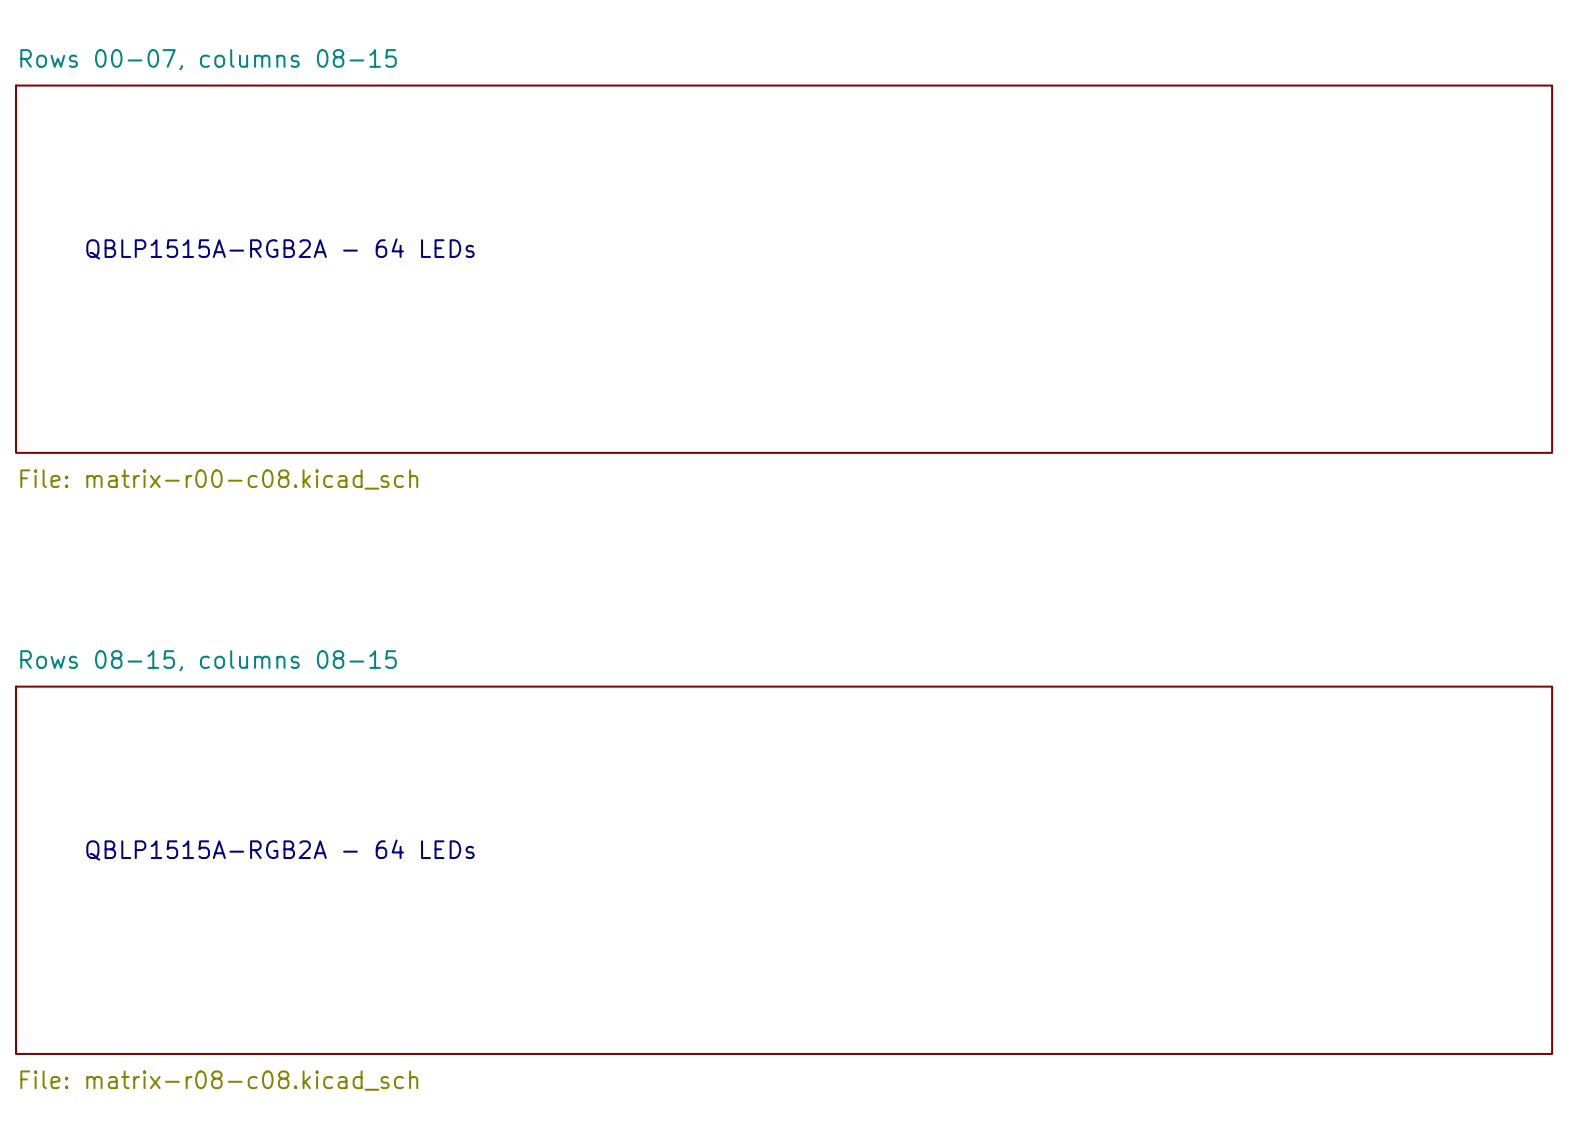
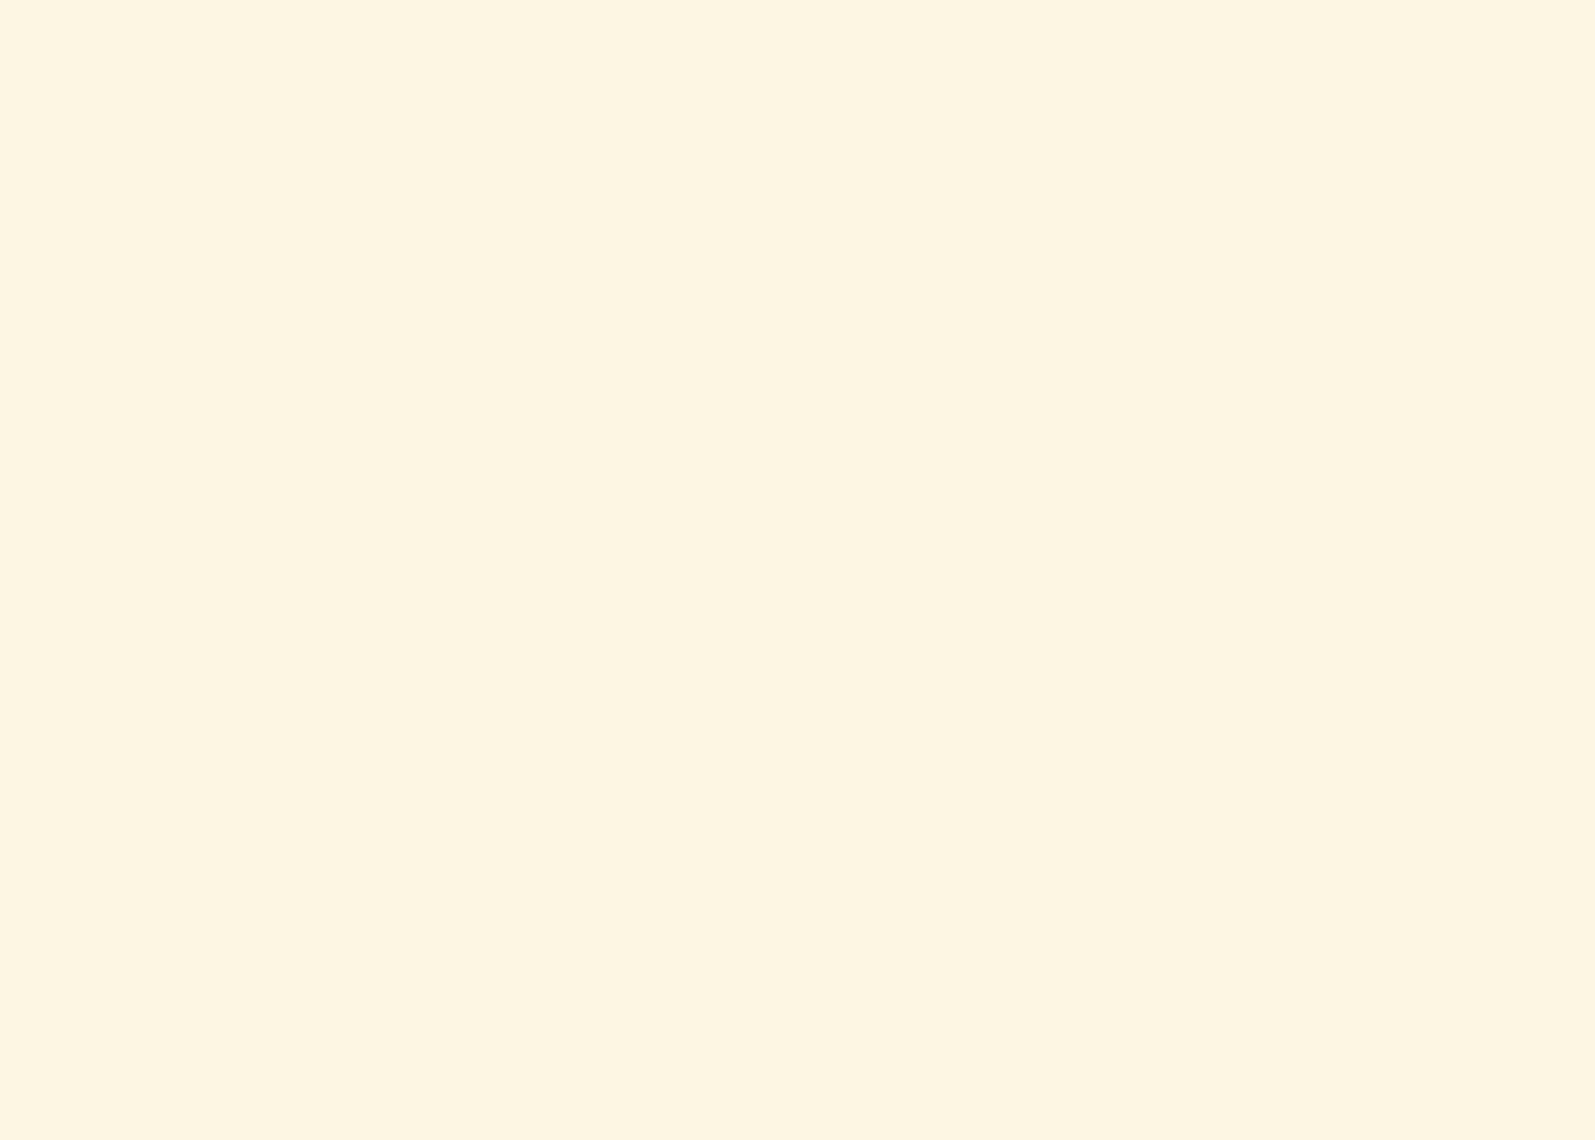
text: QBLP1515A-RGB2A - 64 LEDs (280, 249) -> none
sheet Rows 00-07, columns 08-15: File: matrix-r00-c08.kicad_sch (784, 269) -> none
text: QBLP1515A-RGB2A - 64 LEDs (280, 850) -> none
sheet Rows 08-15, columns 08-15: File: matrix-r08-c08.kicad_sch (784, 870) -> none

